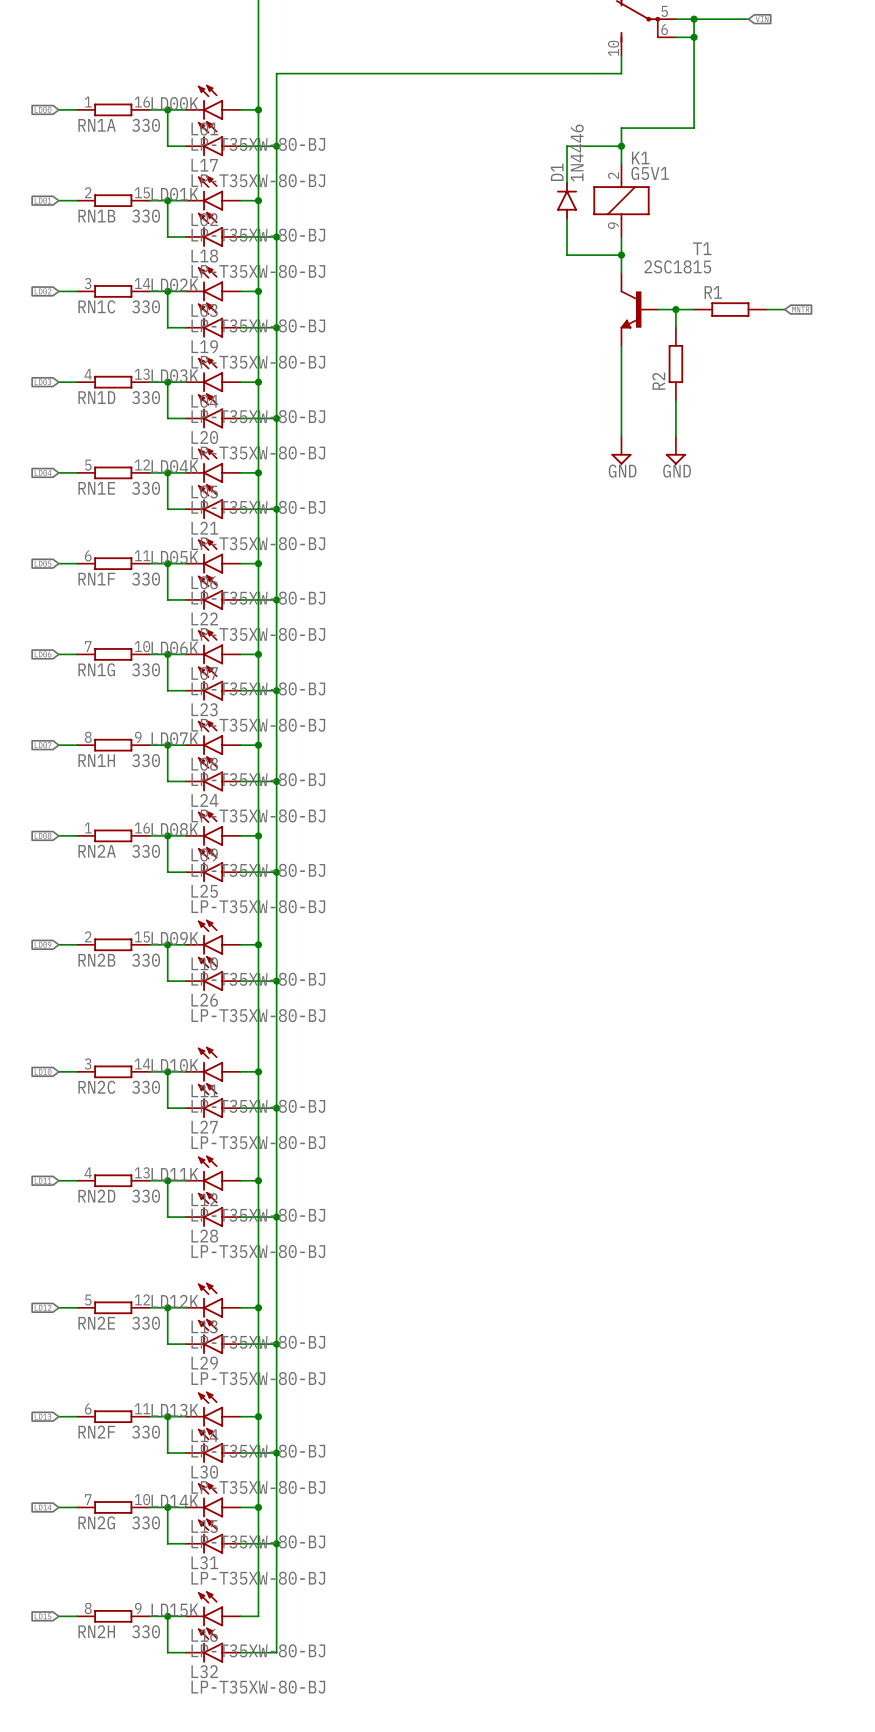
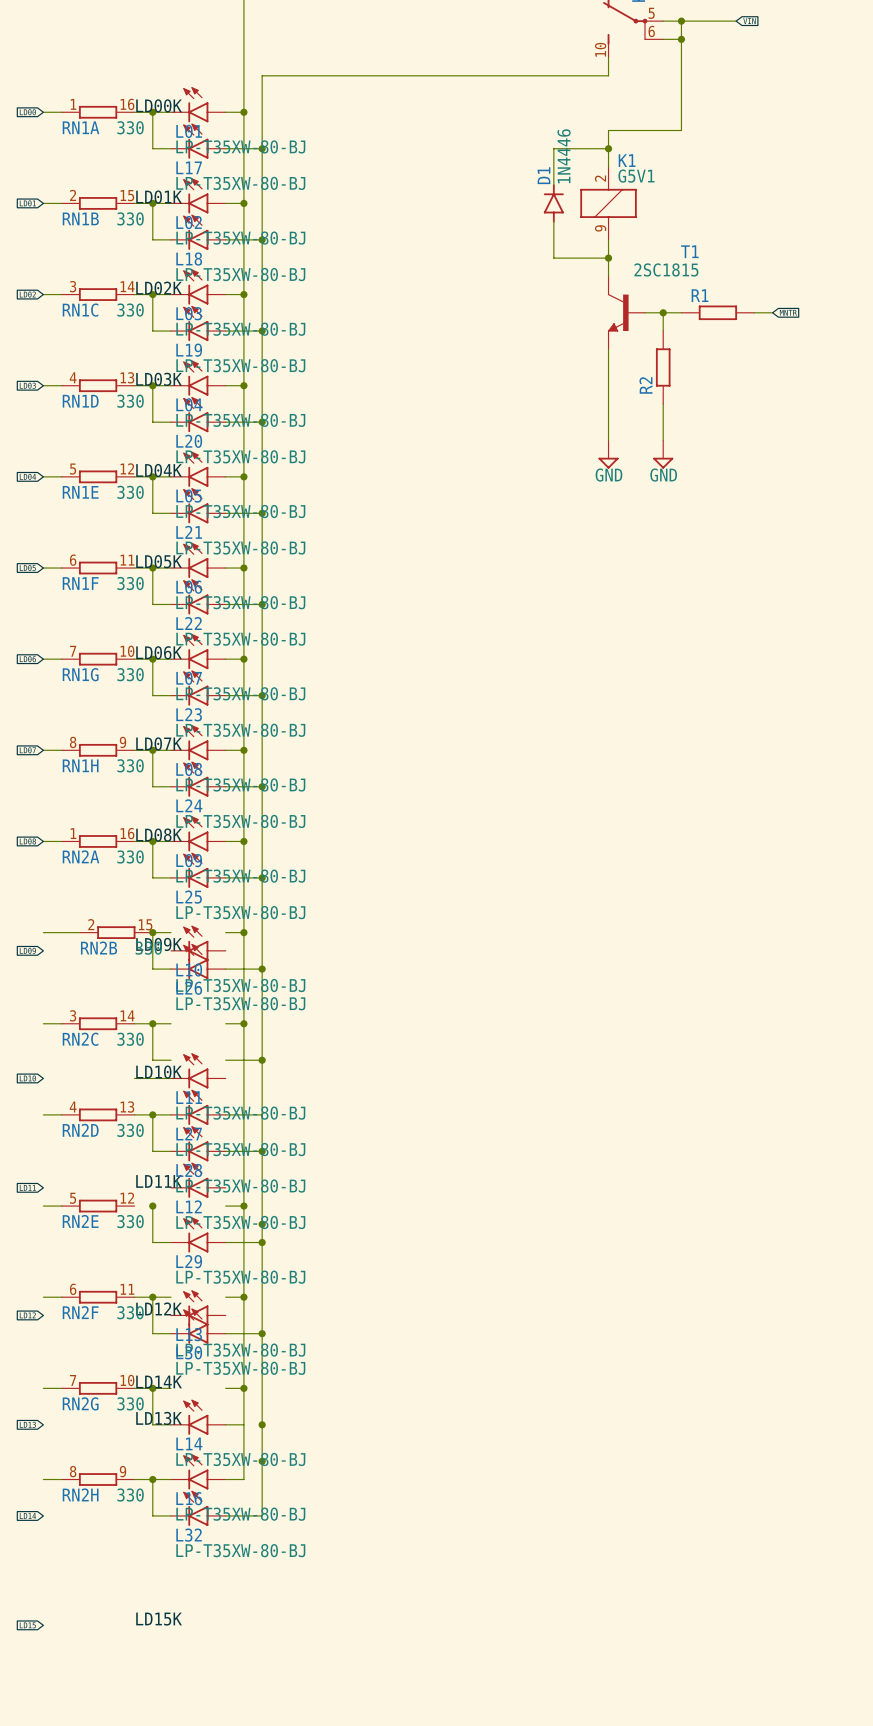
wire: none -> (43, 932) (79, 932)
wire: none -> (171, 932) (152, 932) (152, 950)
junction: none -> (243, 932)
wire: (58, 944) (76, 944) -> (43, 1023) (61, 1023)
RN2B position: (113, 944) -> (116, 932)
wire: (149, 944) (185, 944) -> (134, 1023) (171, 1023)
junction position: (167, 944) -> (152, 932)
wire: (240, 944) (258, 944) -> (225, 1023) (243, 1023)
junction: (258, 944) -> none
wire: (167, 962) (167, 981) (185, 981) -> (152, 969) (171, 969)
wire: none -> (225, 969) (262, 969)
junction: none -> (262, 969)
L26 position: (213, 973) -> (198, 961)
wire: (240, 981) (276, 981) -> (225, 1060) (262, 1060)
junction: (276, 981) -> none
wire: none -> (152, 1023) (152, 1060) (171, 1060)
junction: none -> (152, 1023)
junction: none -> (243, 1023)
wire: (58, 1071) (76, 1071) -> (43, 1206) (61, 1206)
RN2C position: (113, 1071) -> (98, 1023)
wire: (167, 1071) (167, 1108) -> none
junction: (167, 1071) -> none
wire: (240, 1071) (258, 1071) -> (225, 932) (243, 932)
junction position: (258, 1071) -> (262, 1060)
wire: none -> (43, 1114) (61, 1114)
wire: none -> (134, 1114) (152, 1114) (152, 1151) (171, 1151)
junction: none -> (152, 1114)
junction: (276, 1108) -> none
wire: none -> (225, 1151) (262, 1151)
junction: none -> (262, 1151)
wire: (58, 1180) (76, 1180) -> (43, 1297) (61, 1297)
RN2D position: (113, 1180) -> (98, 1114)
wire: (149, 1180) (185, 1180) -> (134, 1297) (171, 1297)
wire: (167, 1180) (167, 1198) -> (152, 1297) (152, 1315)
junction position: (167, 1180) -> (152, 1206)
wire: (240, 1180) (258, 1180) -> (225, 1297) (243, 1297)
junction position: (258, 1180) -> (243, 1206)
wire: none -> (225, 1206) (243, 1206)
L28 position: (213, 1209) -> (198, 1143)
wire: (167, 1217) (185, 1217) -> (152, 1224) (152, 1242) (171, 1242)
wire: (240, 1217) (276, 1217) -> (225, 1242) (262, 1242)
junction: none -> (262, 1242)
junction: none -> (243, 1297)
wire: (58, 1307) (76, 1307) -> (43, 1388) (61, 1388)
RN2E position: (113, 1307) -> (98, 1206)
wire: (149, 1307) (185, 1307) -> (134, 1388) (171, 1388)
junction position: (167, 1307) -> (152, 1297)
wire: (240, 1307) (258, 1307) -> (225, 1388) (243, 1388)
junction: (258, 1307) -> none
wire: (167, 1325) (167, 1344) (185, 1344) -> (152, 1333) (171, 1333)
junction: none -> (262, 1333)
L29 position: (213, 1336) -> (198, 1234)
wire: (240, 1344) (276, 1344) -> (225, 1333) (262, 1333)
junction: (276, 1344) -> none
wire: none -> (152, 1388) (152, 1424)
junction: none -> (152, 1388)
junction: none -> (243, 1388)
wire: (58, 1416) (76, 1416) -> none
RN2F position: (113, 1416) -> (98, 1297)
wire: (149, 1416) (167, 1416) (167, 1453) (185, 1453) -> none
junction: (167, 1416) -> none
junction: (258, 1416) -> none
junction: none -> (262, 1424)
L30 position: (213, 1445) -> (198, 1326)
wire: (240, 1453) (276, 1453) -> none
wire: none -> (152, 1479) (152, 1515)
junction: none -> (152, 1479)
wire: (258, 1471) (258, 1616) (240, 1616) -> (243, 1479) (225, 1479)
label position: LD14K (174, 1501) -> LD14K (159, 1381)
wire: (58, 1507) (76, 1507) -> none
RN2G position: (113, 1507) -> (98, 1388)
wire: (149, 1507) (167, 1507) (167, 1543) (185, 1543) -> none
junction: (167, 1507) -> none
junction: (258, 1507) -> none
wire: (276, 1507) (276, 1652) (240, 1652) -> (262, 1515) (243, 1515)
L15 name: L15 (204, 1526) -> L32 (189, 1535)
L31: LP-T35XW-80-BJ (213, 1536) -> none
wire: (240, 1543) (276, 1543) -> none
junction: (276, 1543) -> none
L16 position: (213, 1608) -> (198, 1471)
wire: (58, 1616) (76, 1616) -> (43, 1479) (61, 1479)
RN2H position: (113, 1616) -> (98, 1479)
wire: (149, 1616) (185, 1616) -> (134, 1479) (171, 1479)
wire: (167, 1616) (167, 1652) (185, 1652) -> none
junction: (167, 1616) -> none
L32: LP-T35XW-80-BJ (213, 1645) -> none

